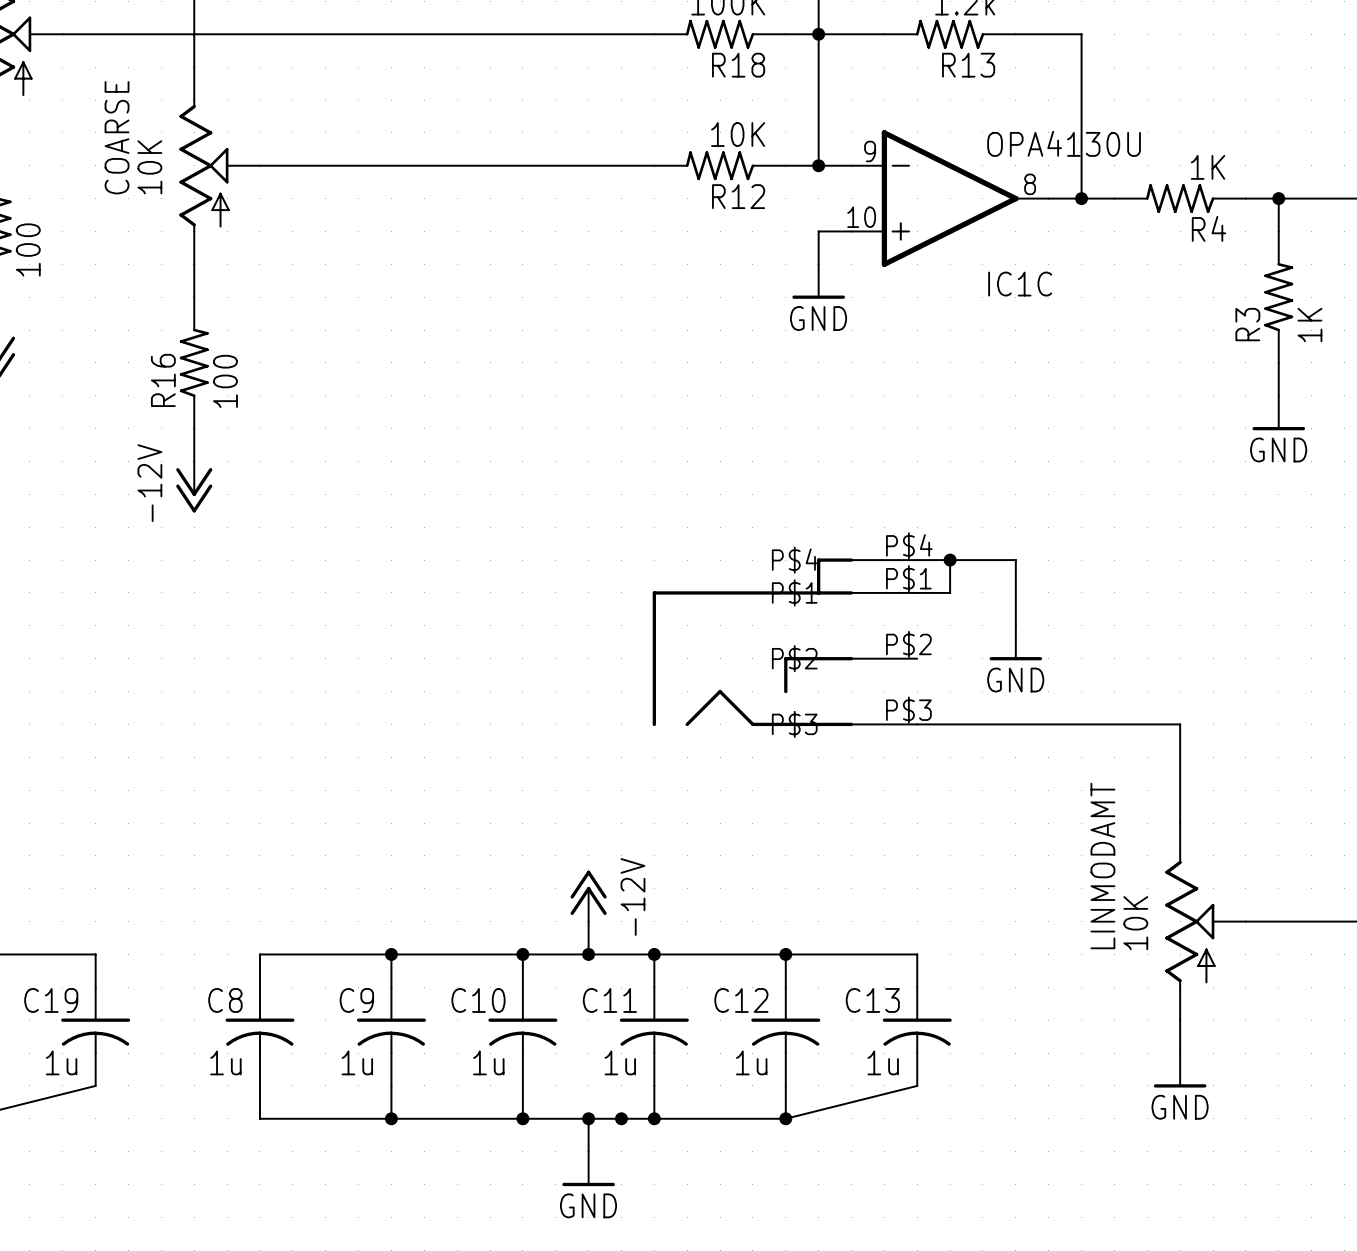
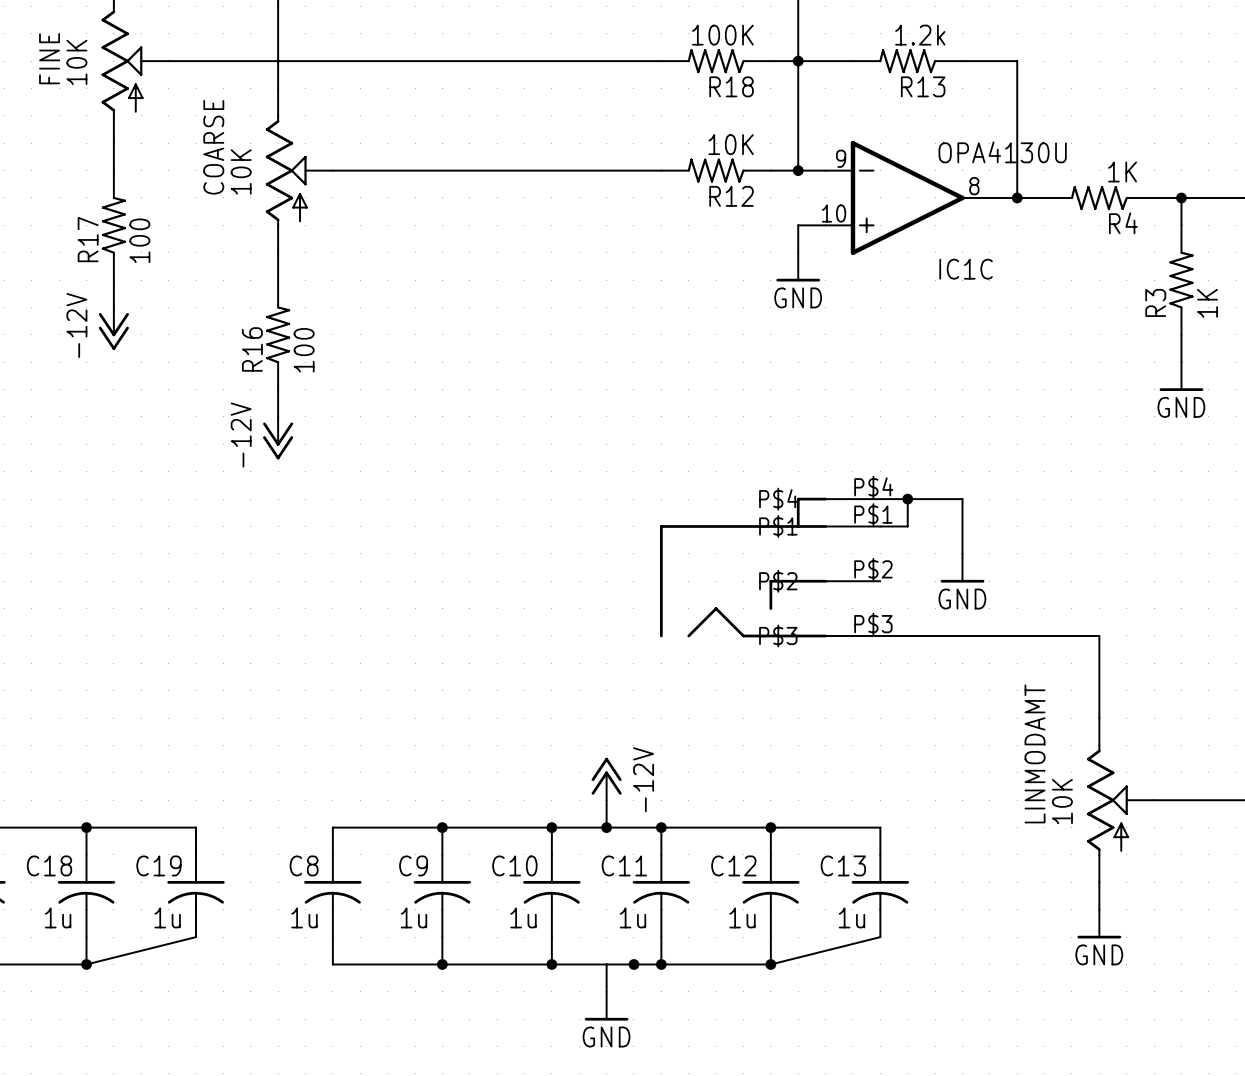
junction: (588, 1118) -> none

